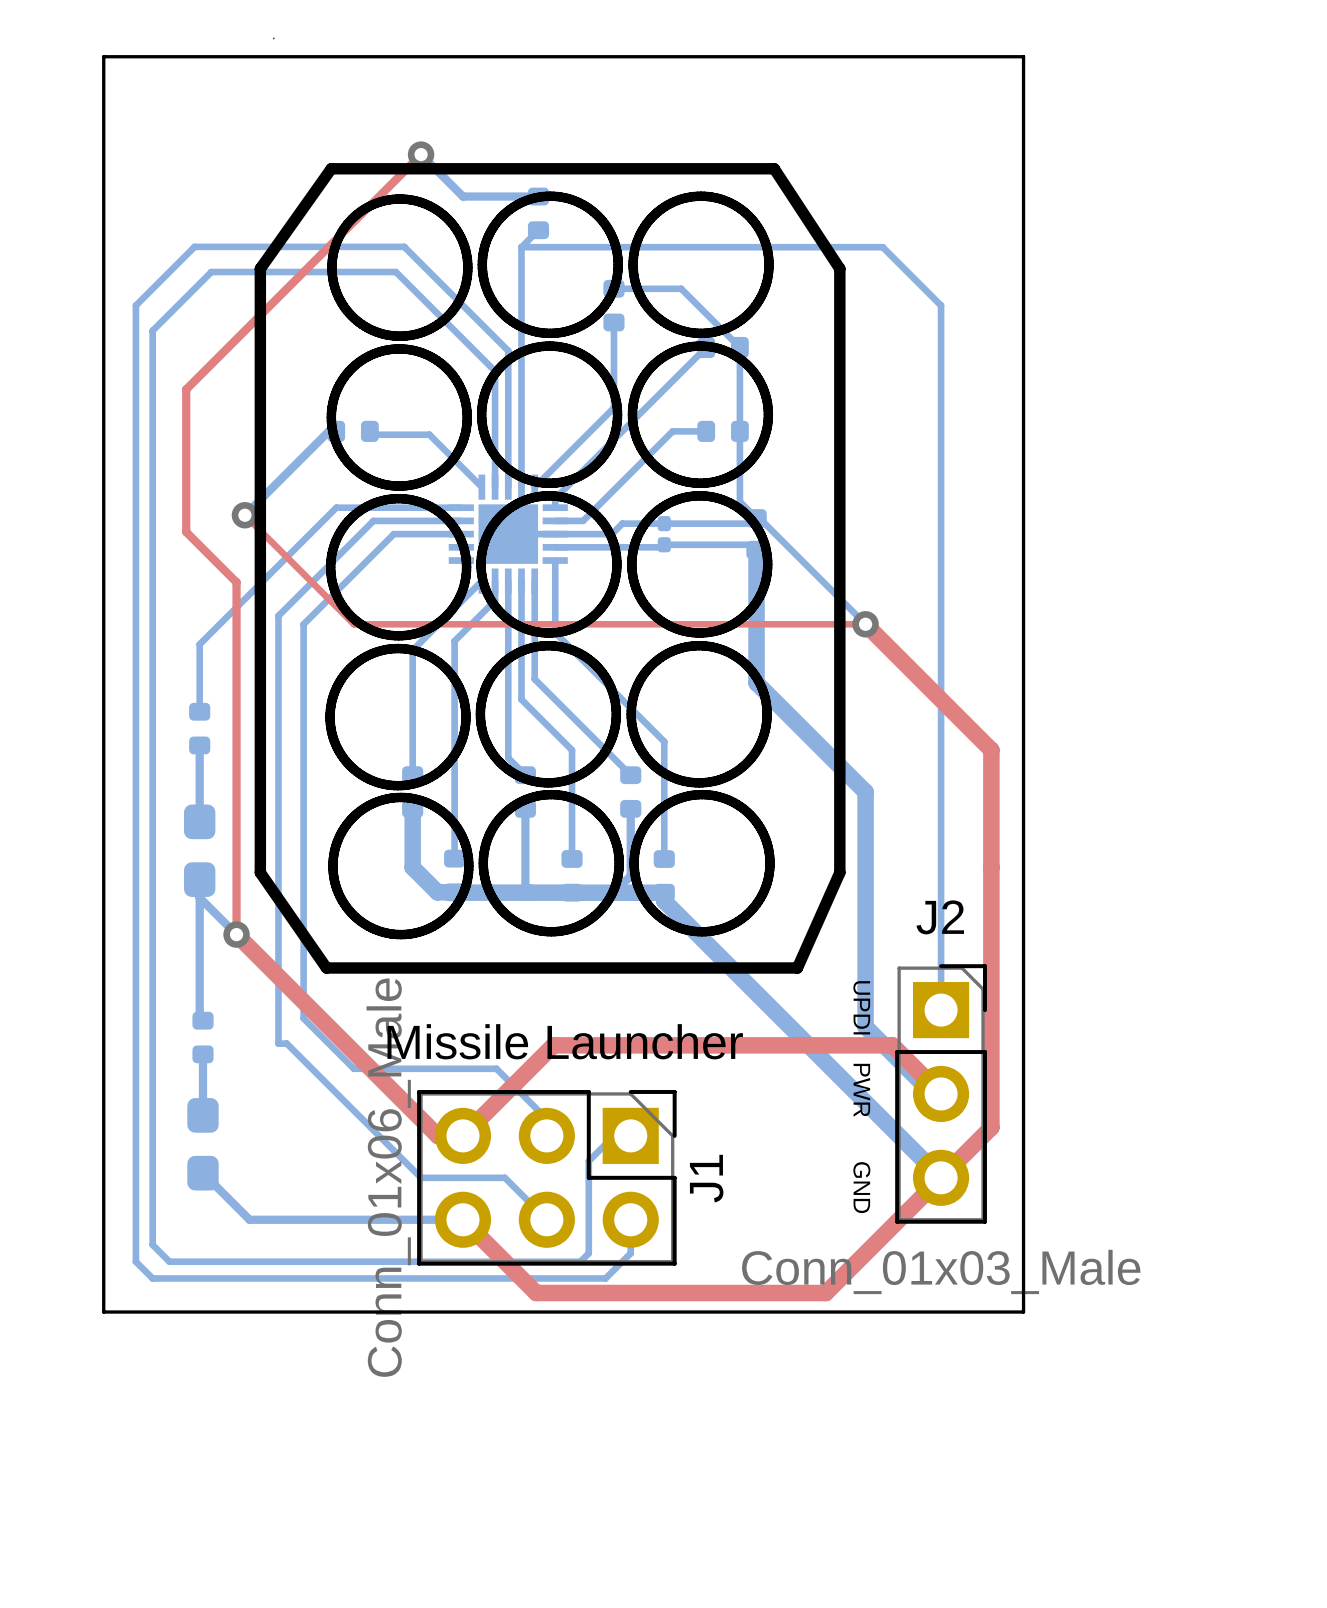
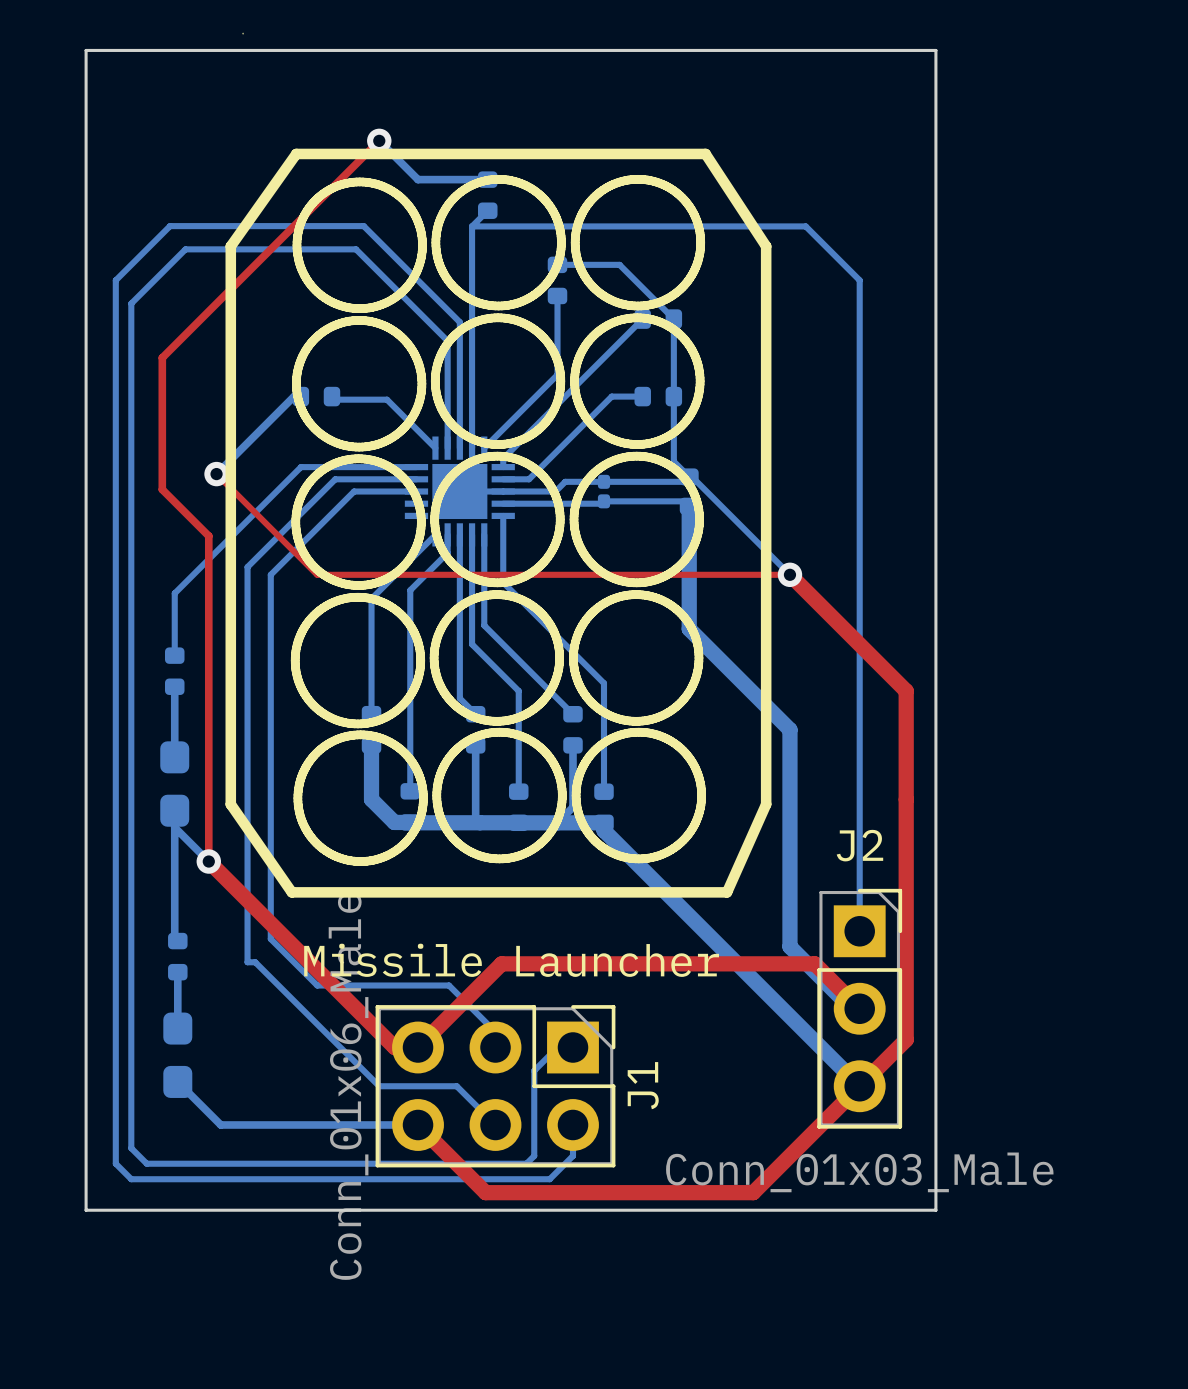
text: UPDI (861, 1007) -> none
text: PWR (861, 1090) -> none
text: GND (861, 1187) -> none

